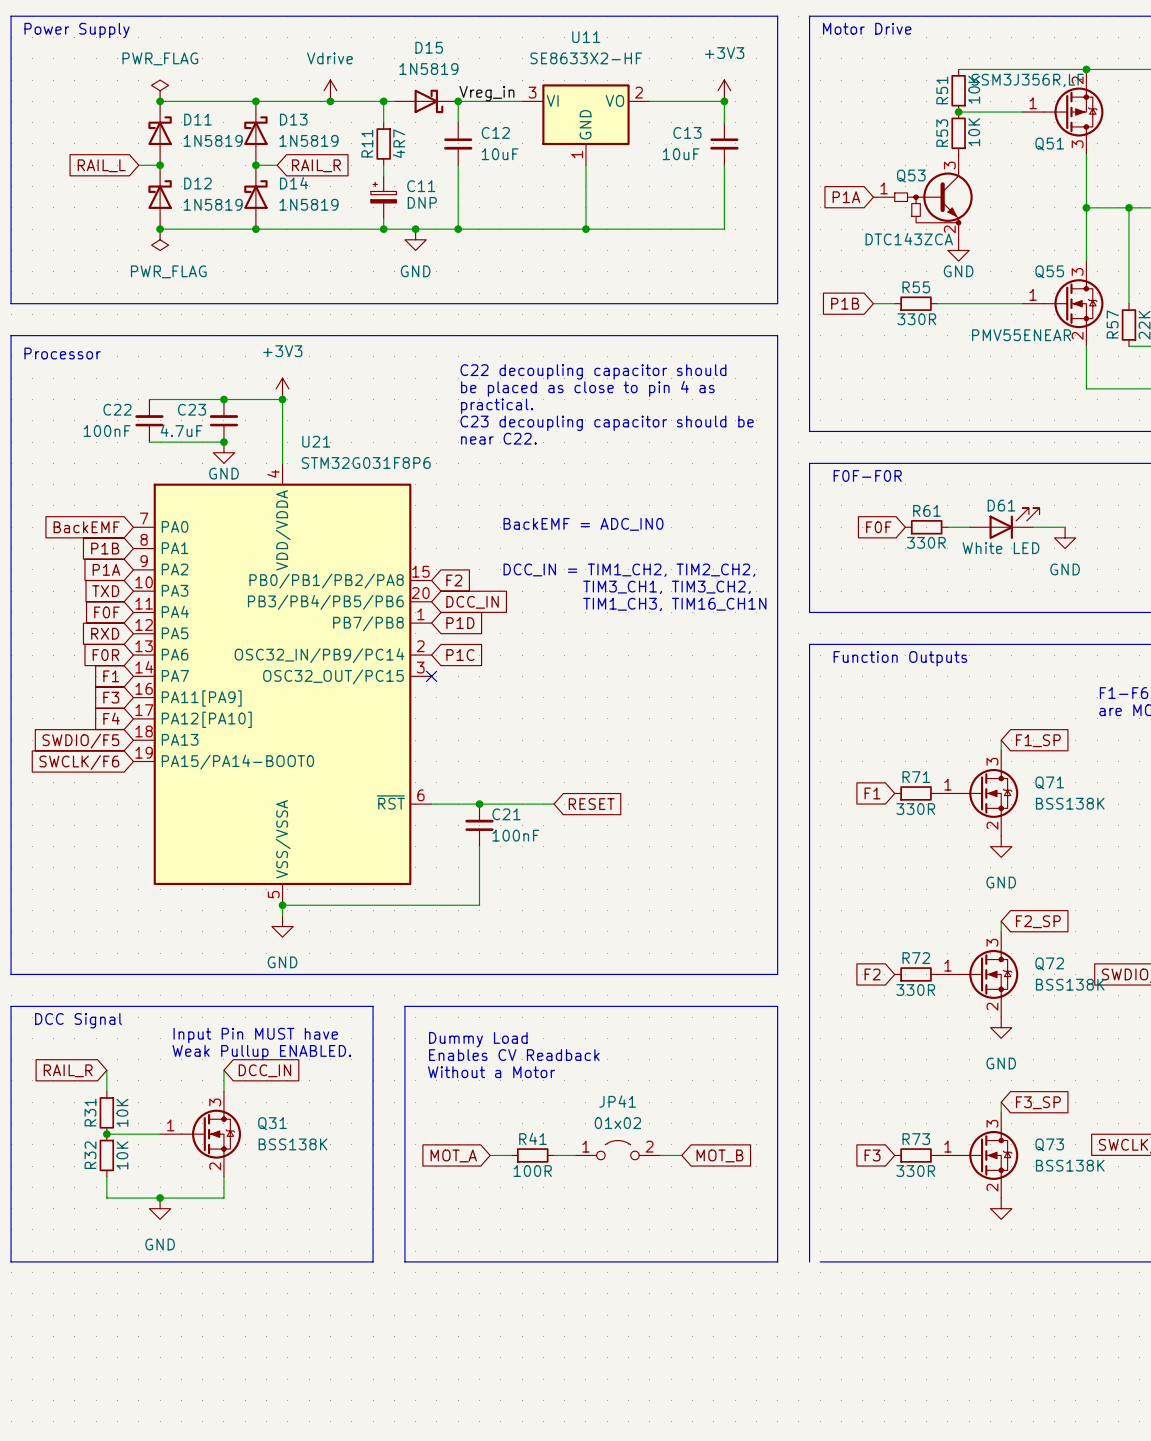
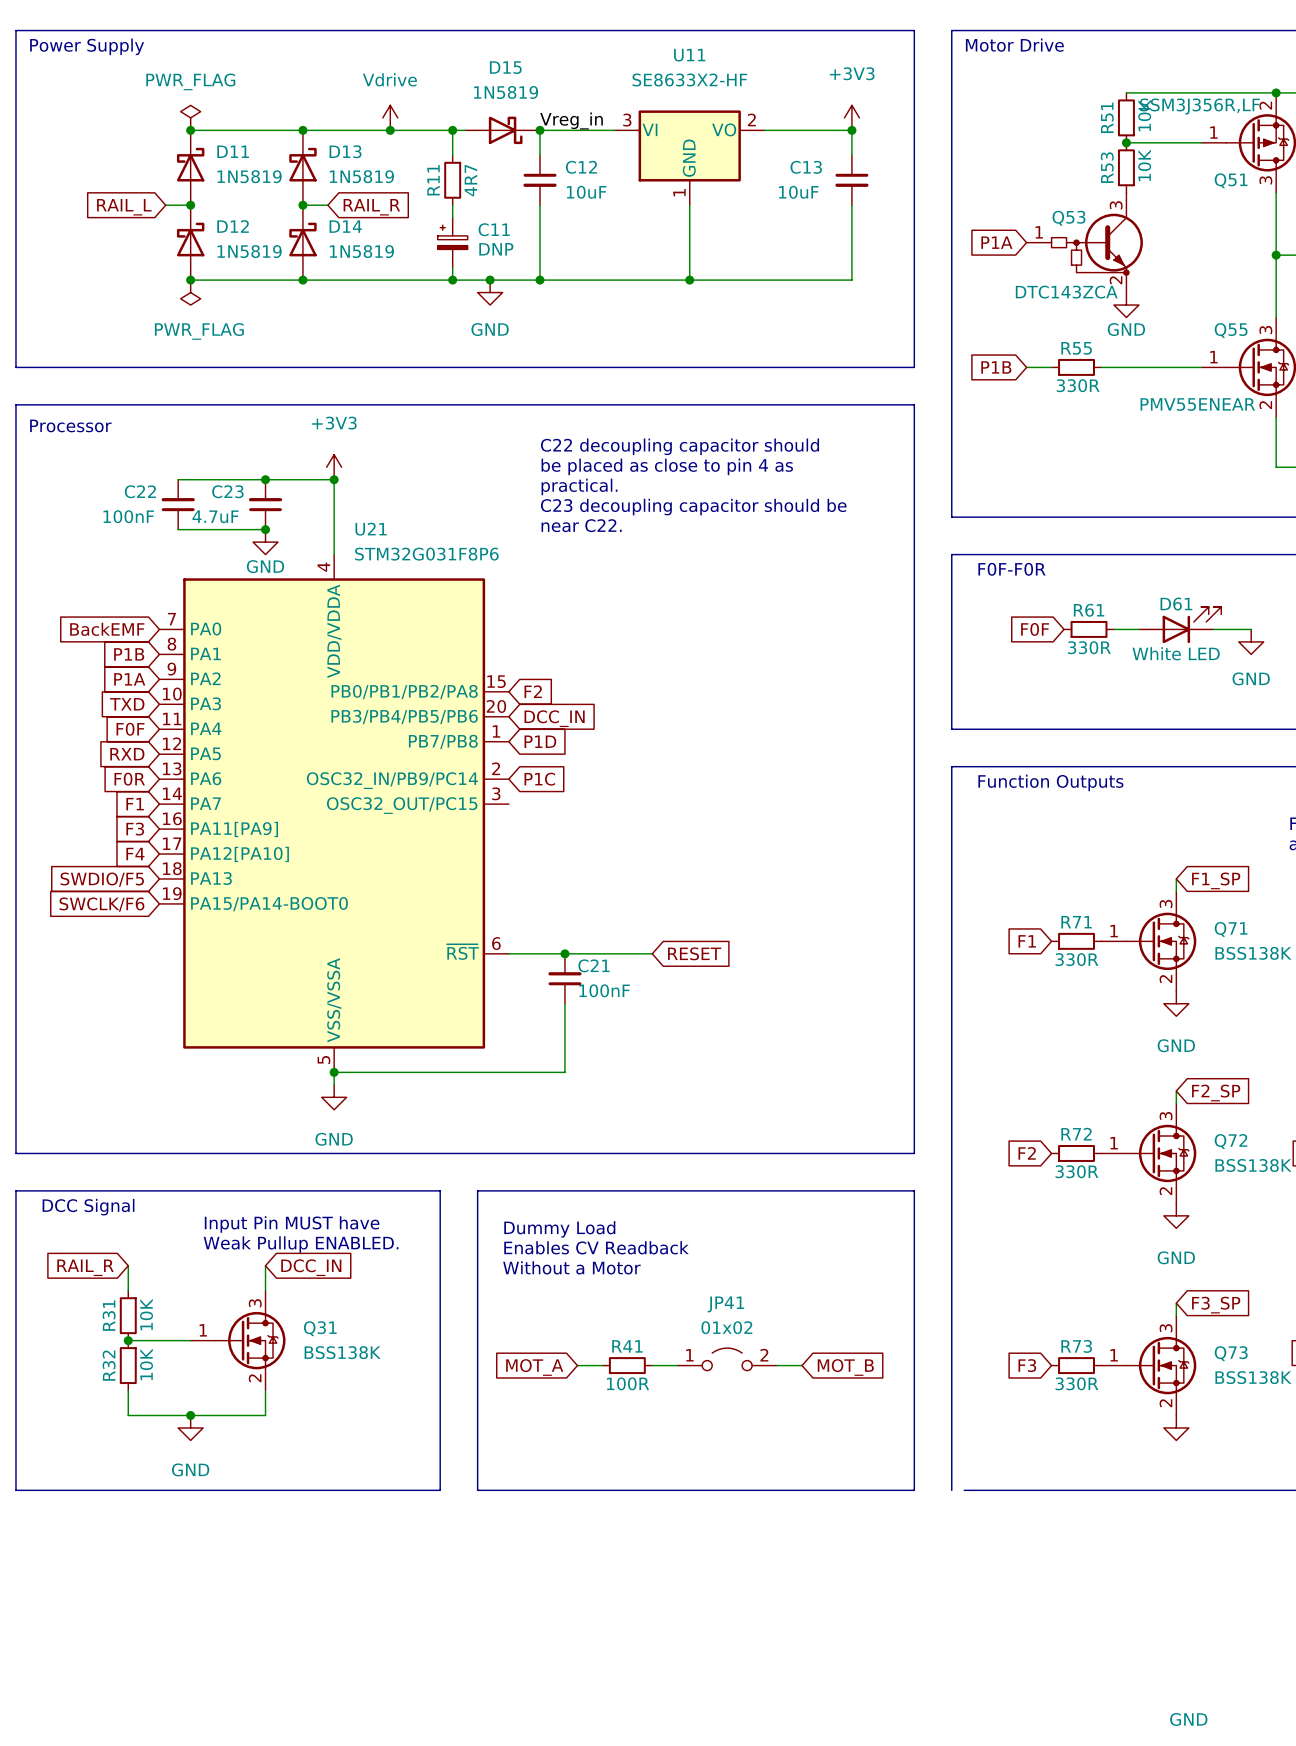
text: BackEMF = ADC_IN0 (583, 524) -> none
text: DCC_IN = TIM1_CH2, TIM2_CH2, (629, 570) -> none
text: TIM3_CH1, TIM3_CH2, (666, 587) -> none
text: TIM1_CH3, TIM16_CH1N (674, 604) -> none
no-connect mark: (431, 676) -> none

